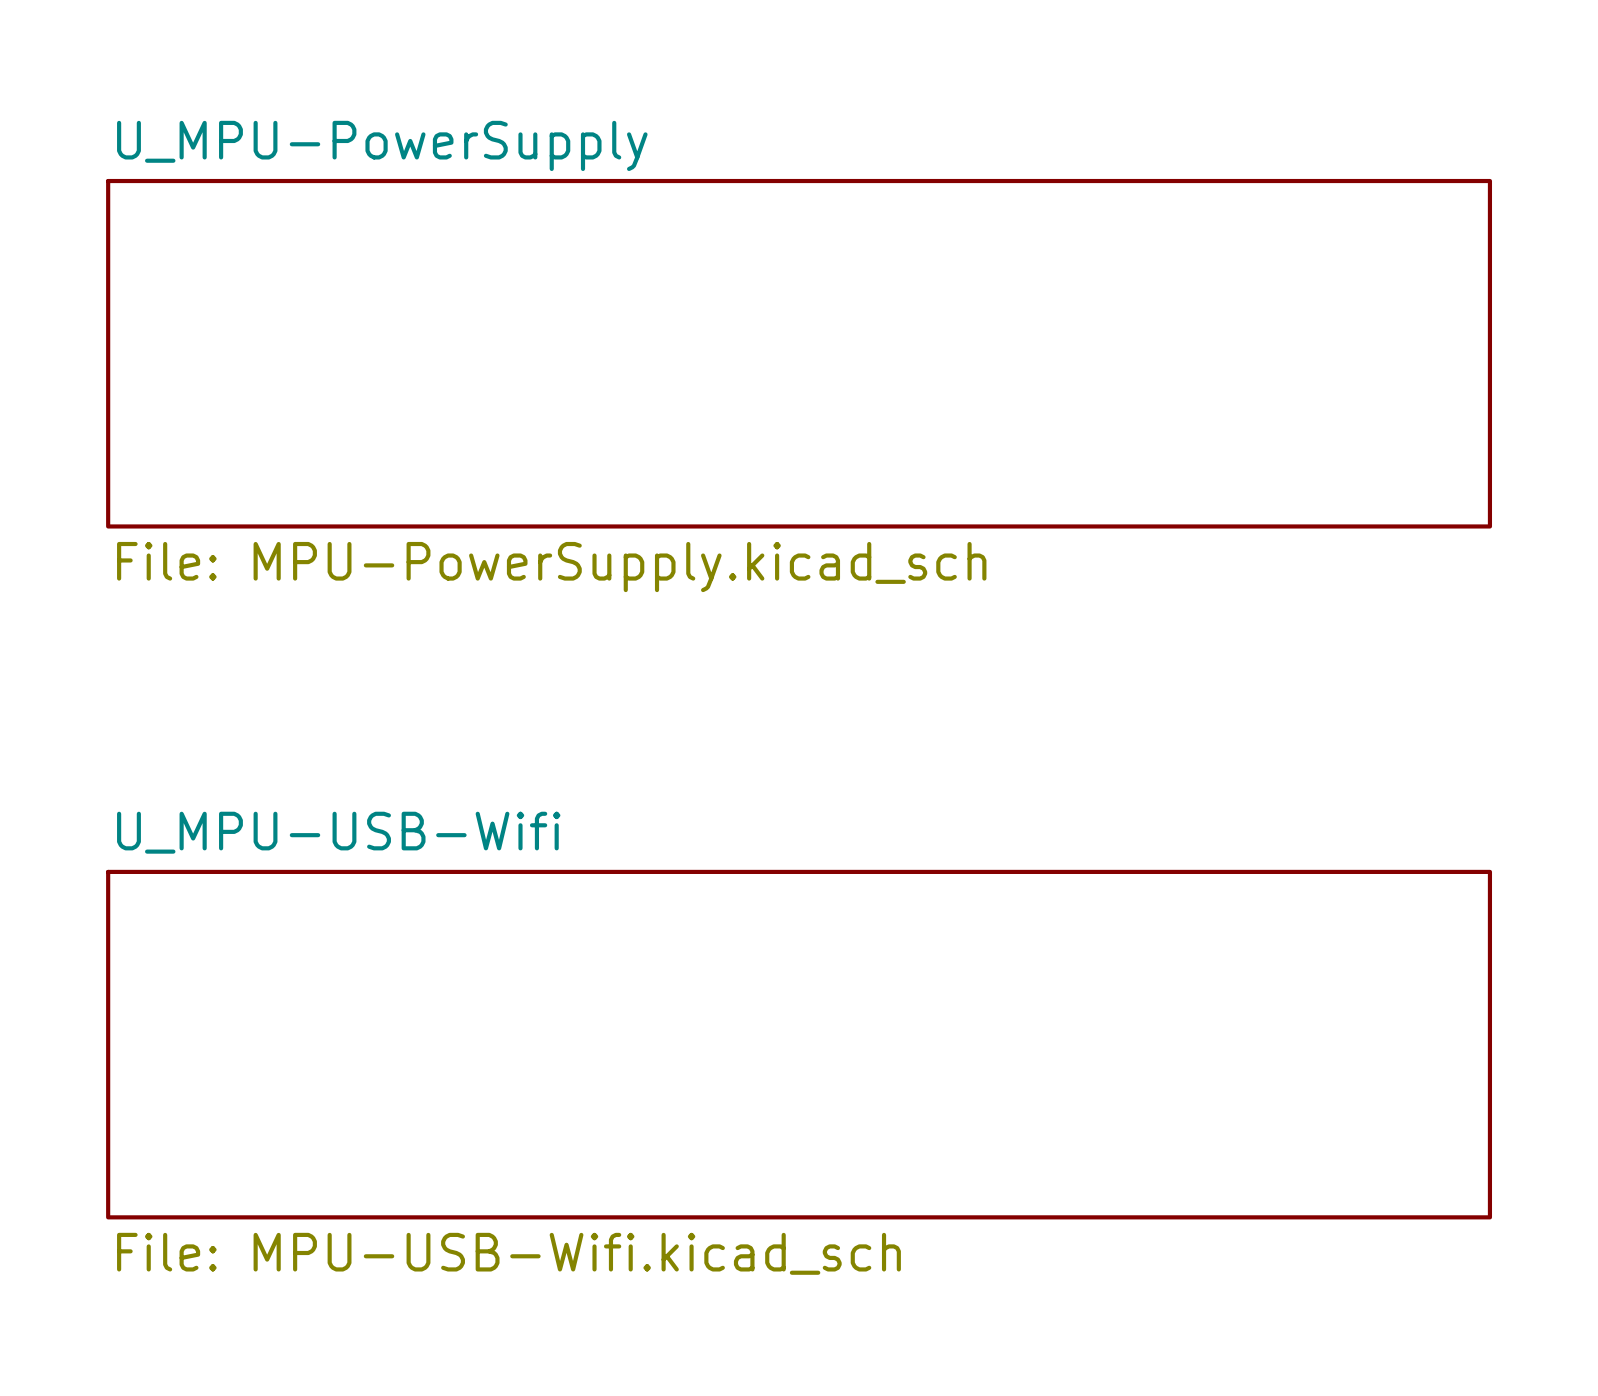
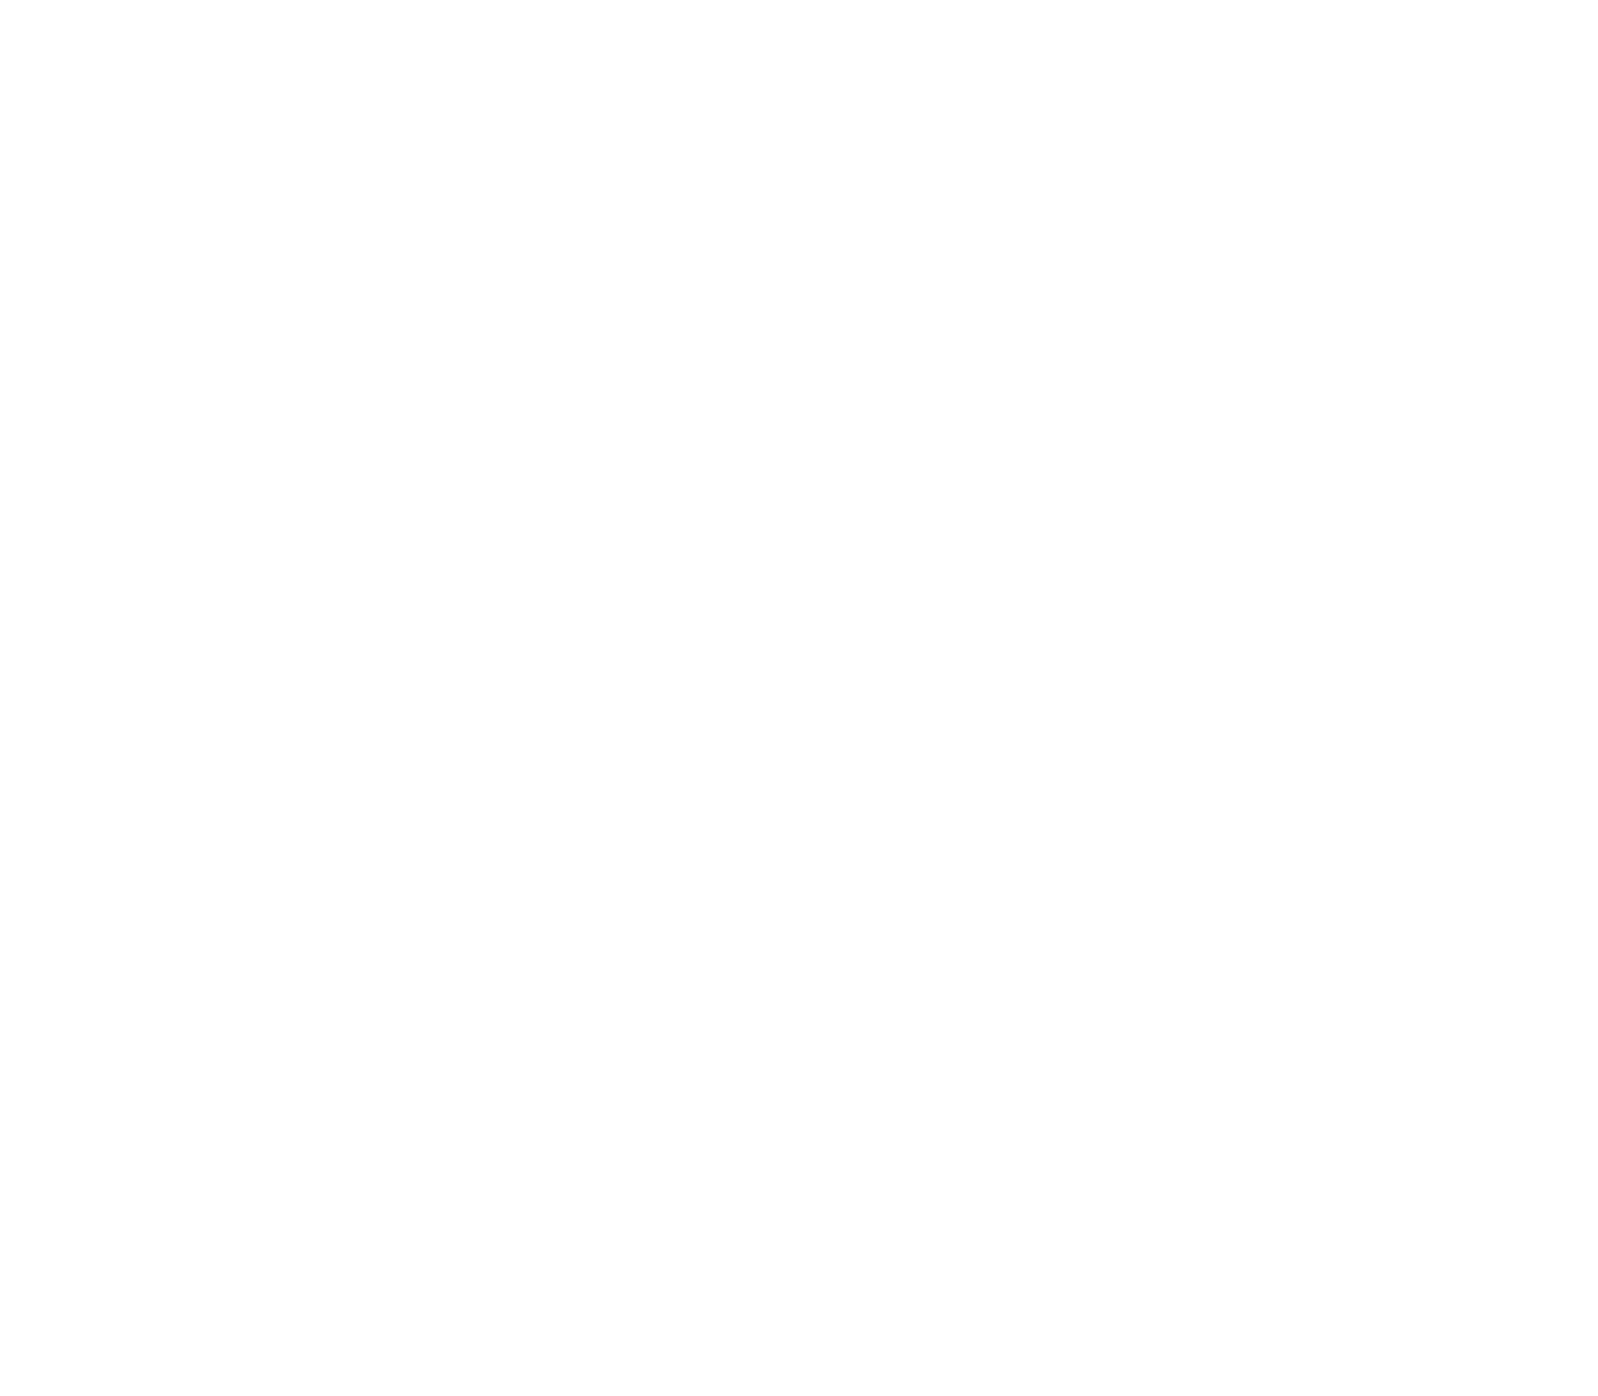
sheet U_MPU-PowerSupply: File: MPU-PowerSupply.kicad_sch (799, 353) -> none
sheet U_MPU-USB-Wifi: File: MPU-USB-Wifi.kicad_sch (799, 1044) -> none

